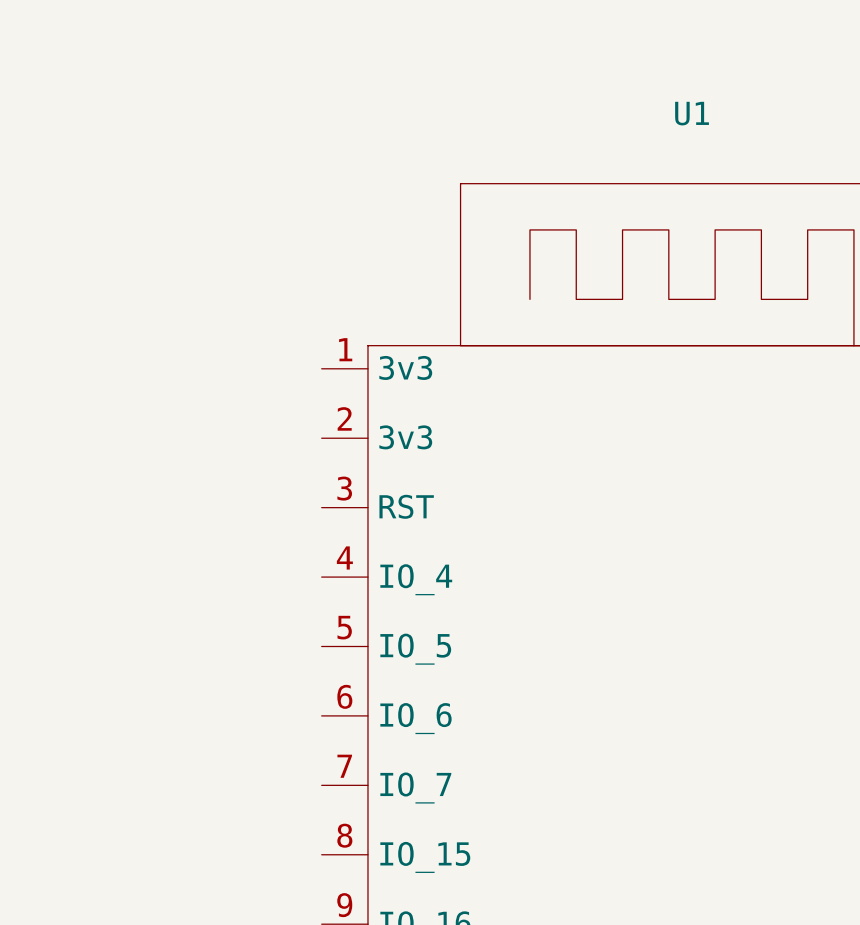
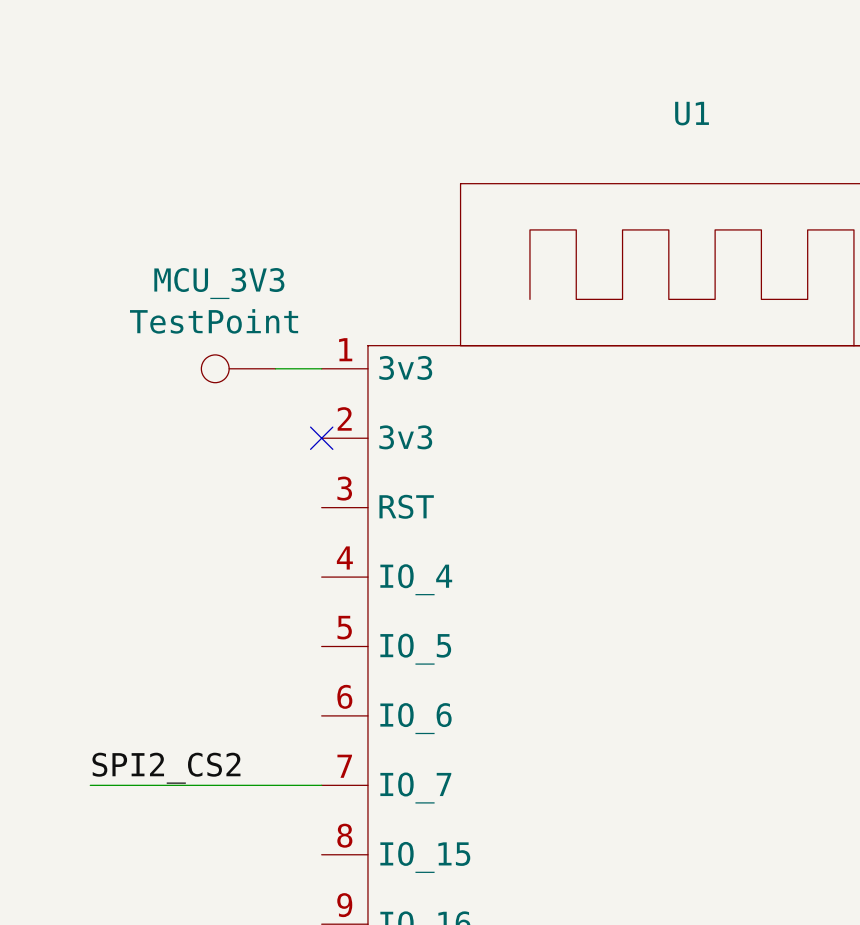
MCU_3V3: none -> TestPoint (238, 368)
wire: none -> (275, 368) (321, 368)
no-connect mark: none -> (321, 438)
label: none -> SPI2_CS2 (166, 768)
wire: none -> (90, 785) (321, 785)

